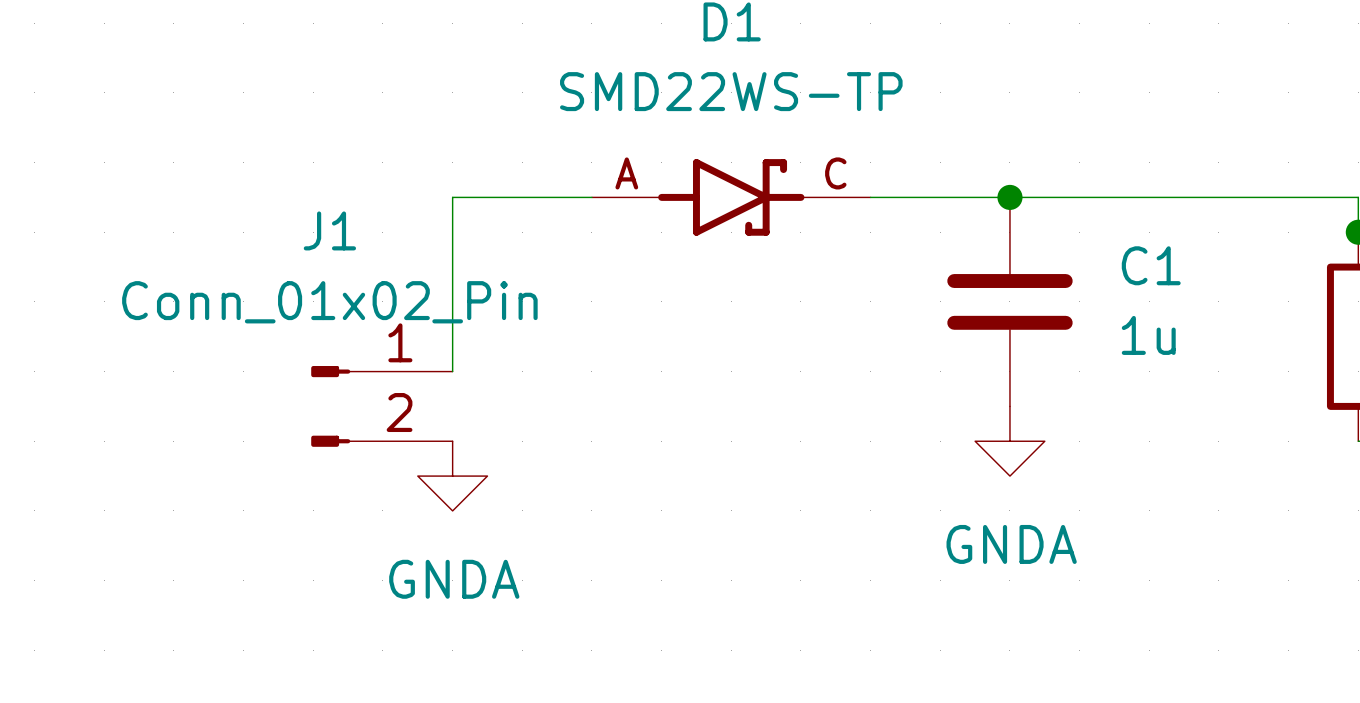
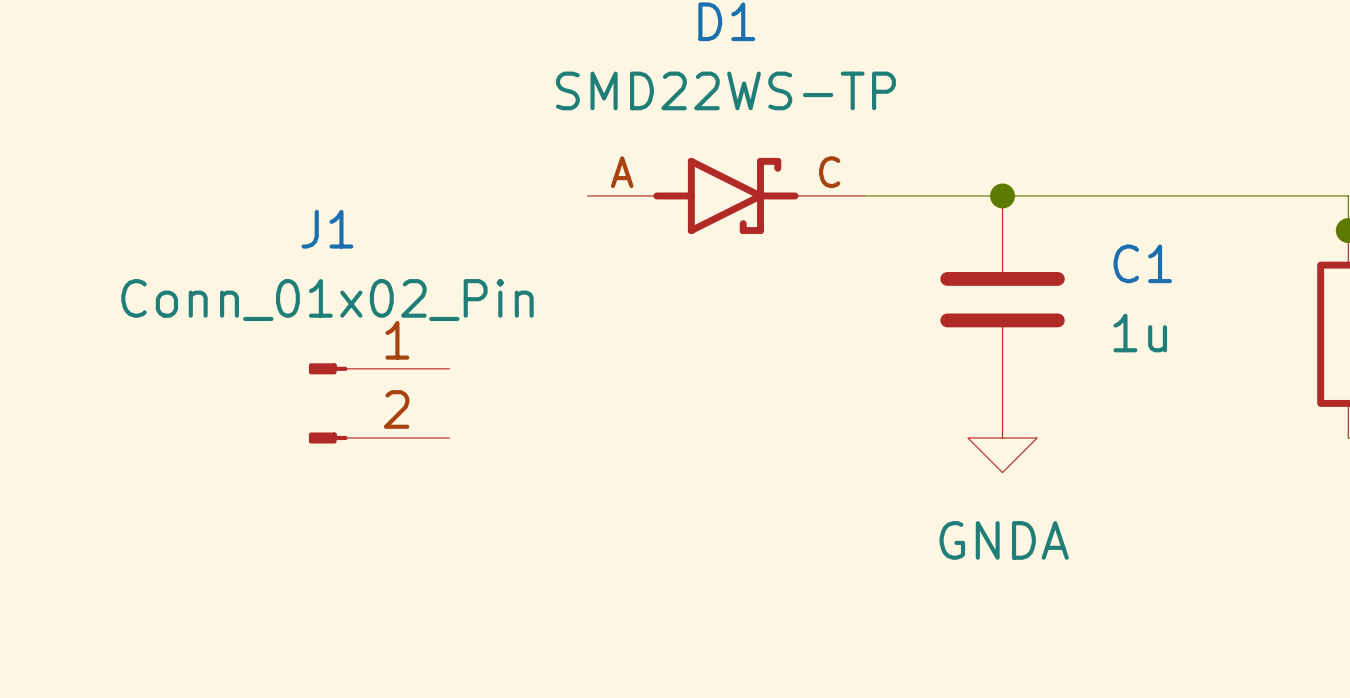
wire: (591, 197) (452, 197) (452, 371) -> none
power symbol: GNDA (452, 476) -> none

